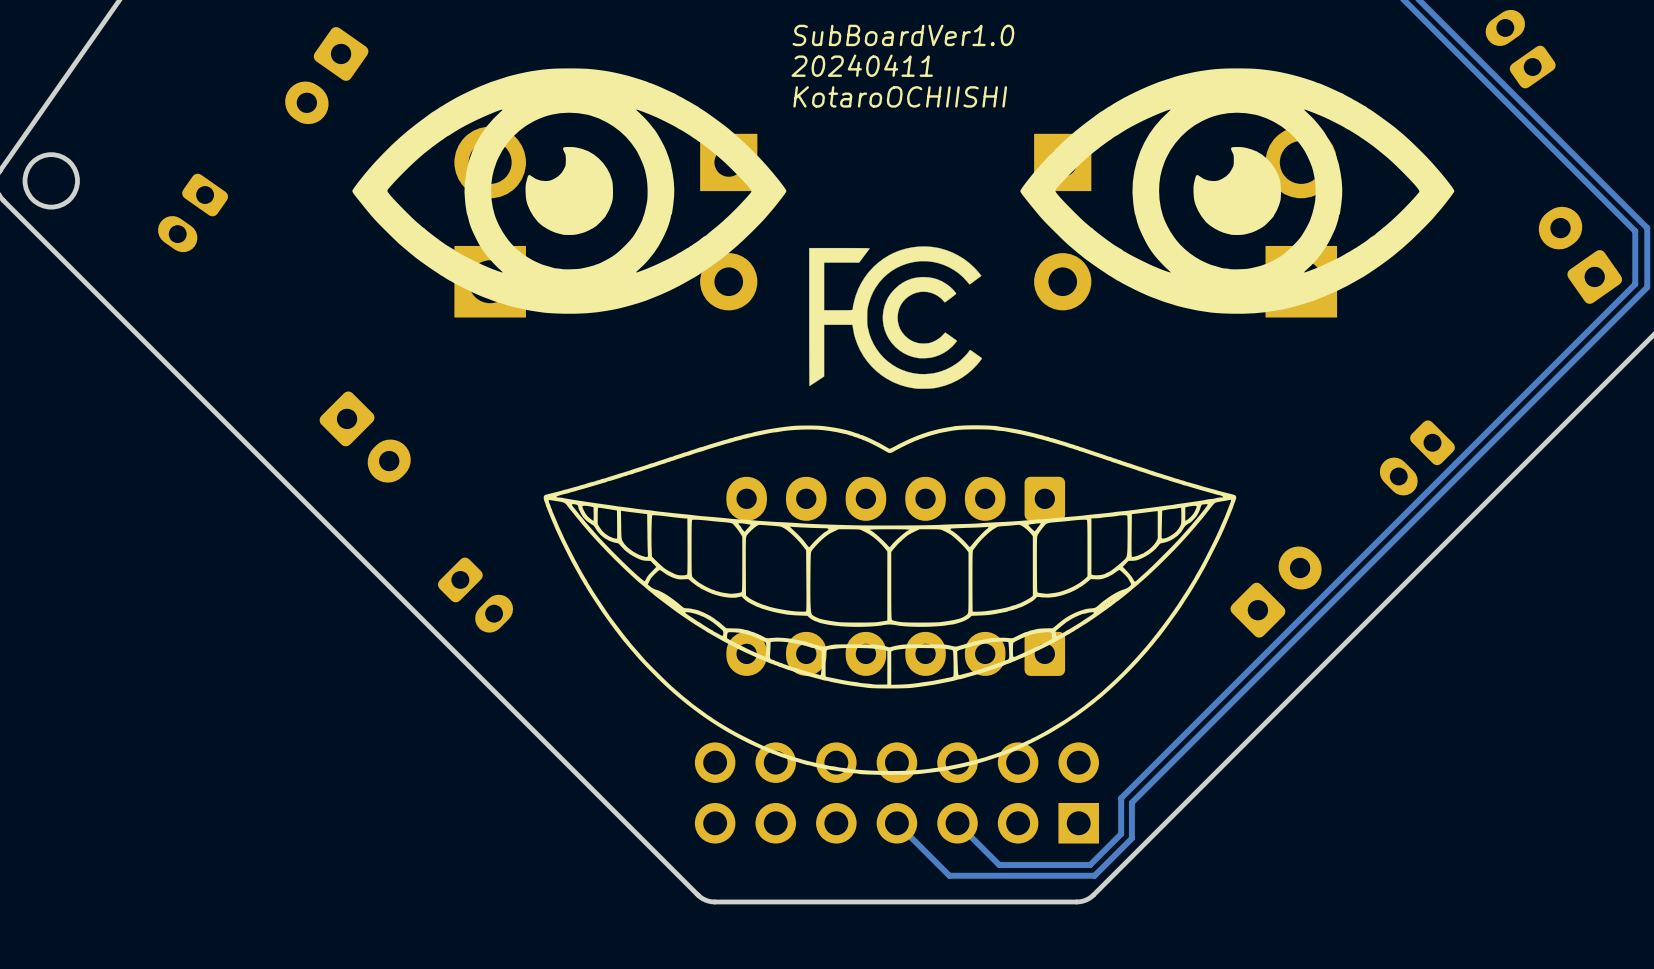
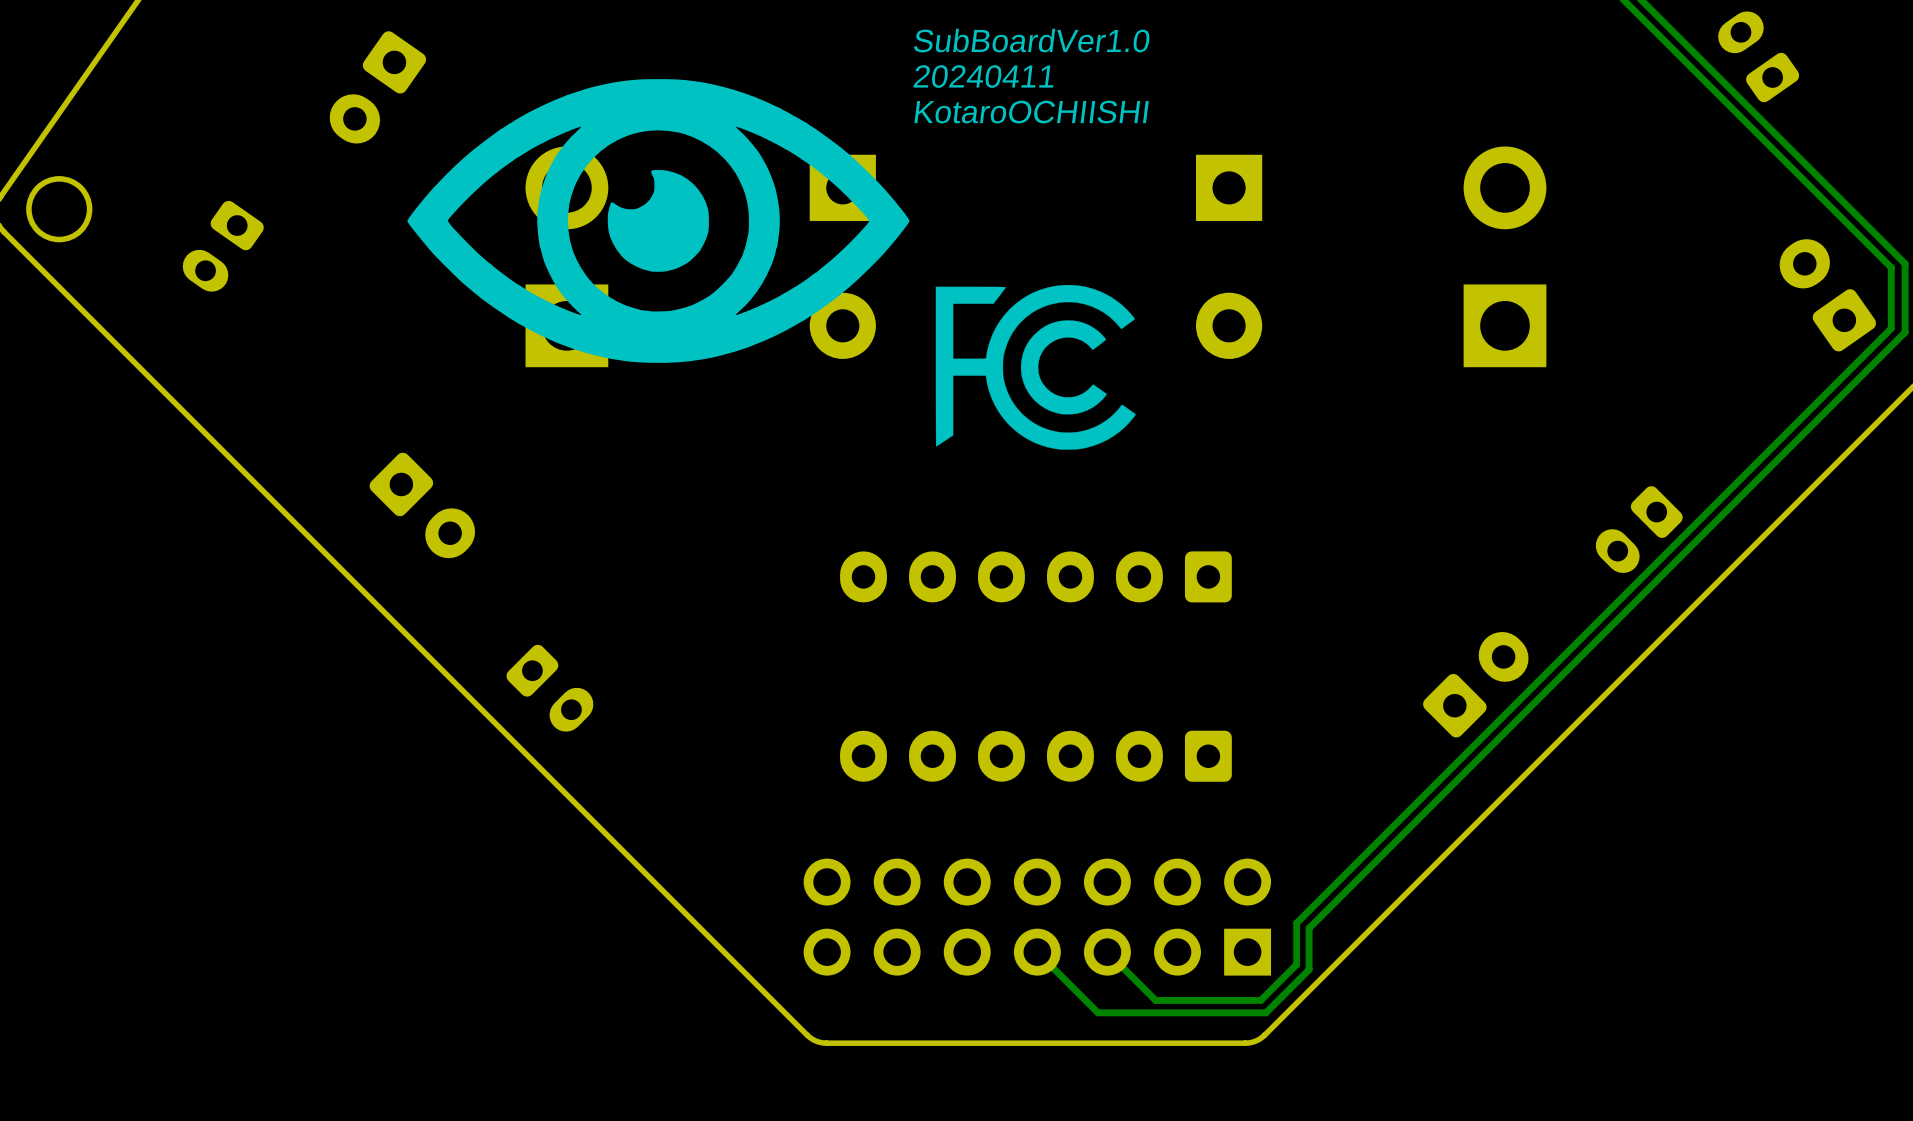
drawing: [1020, 68, 1455, 314] -> none
drawing: [543, 425, 1237, 775] -> none

